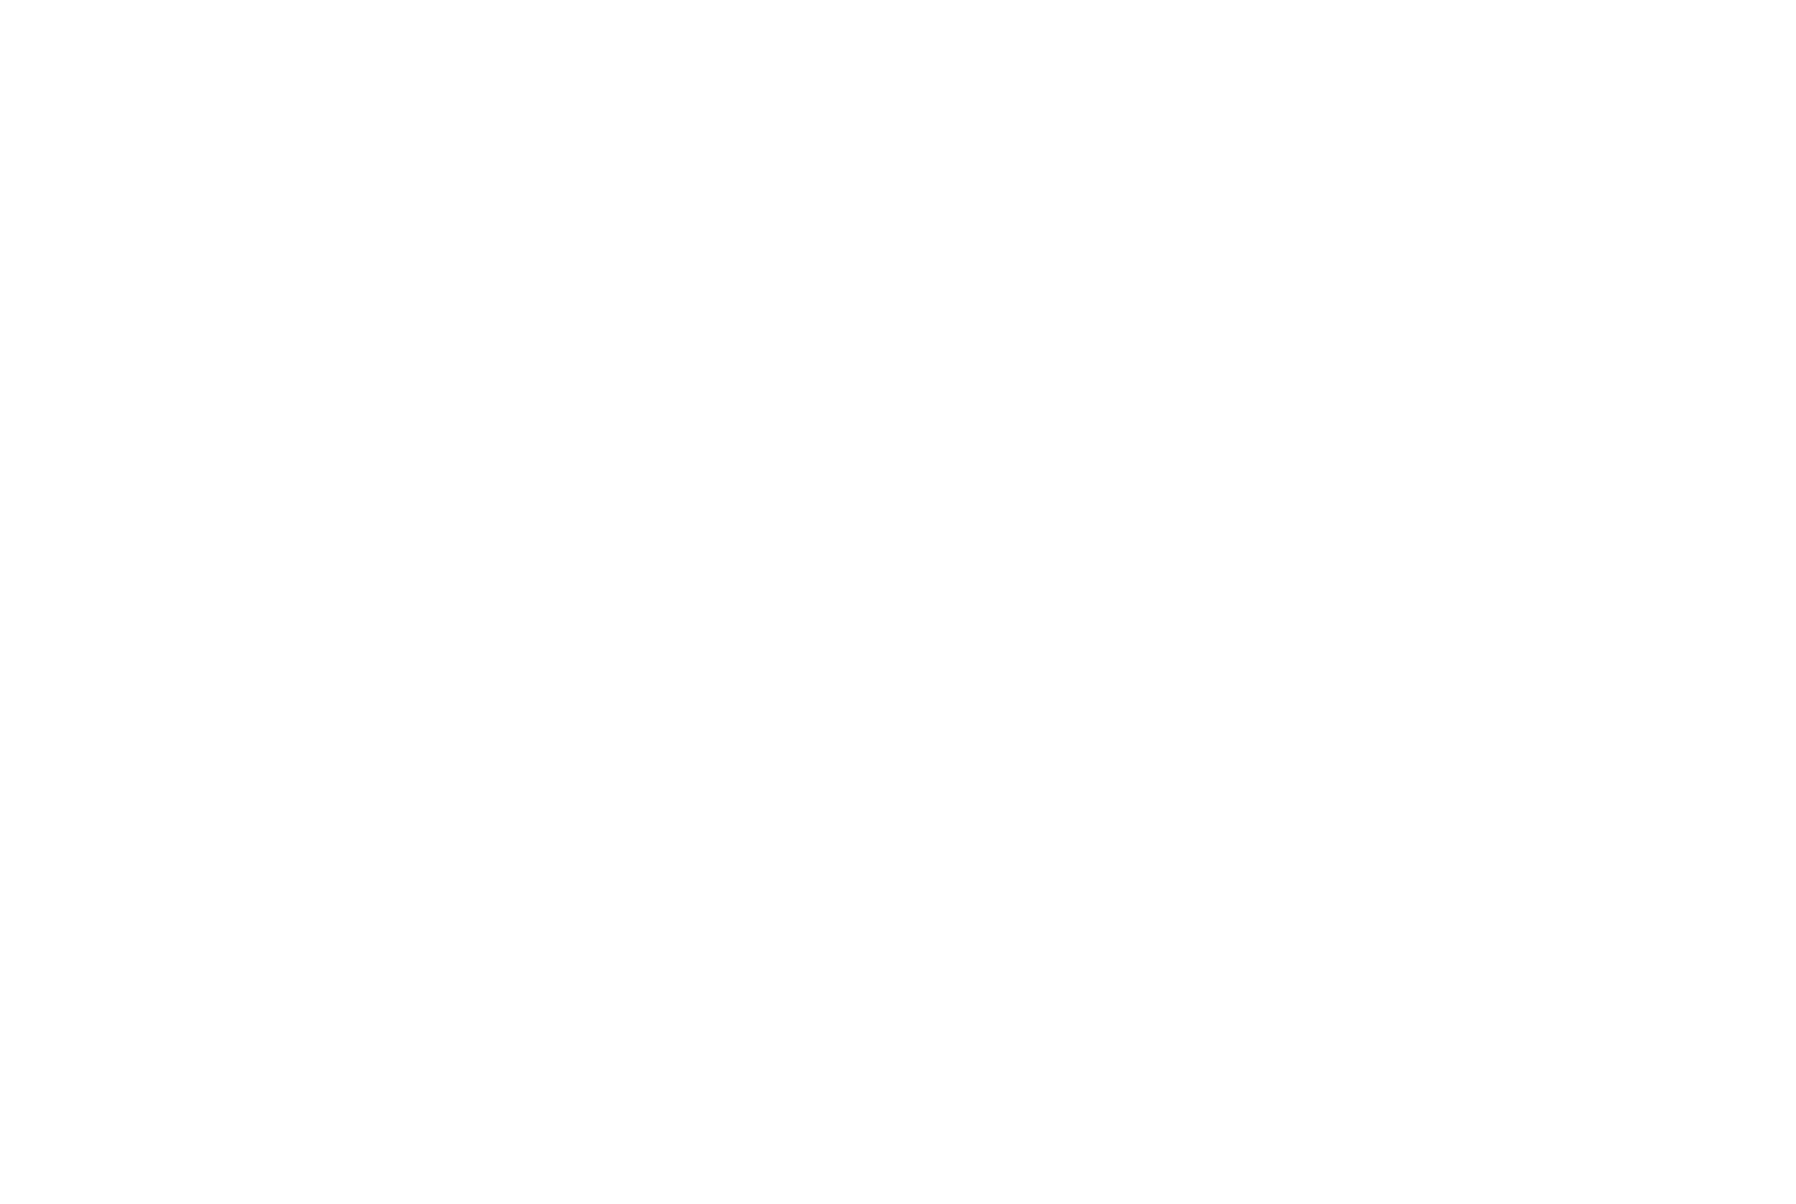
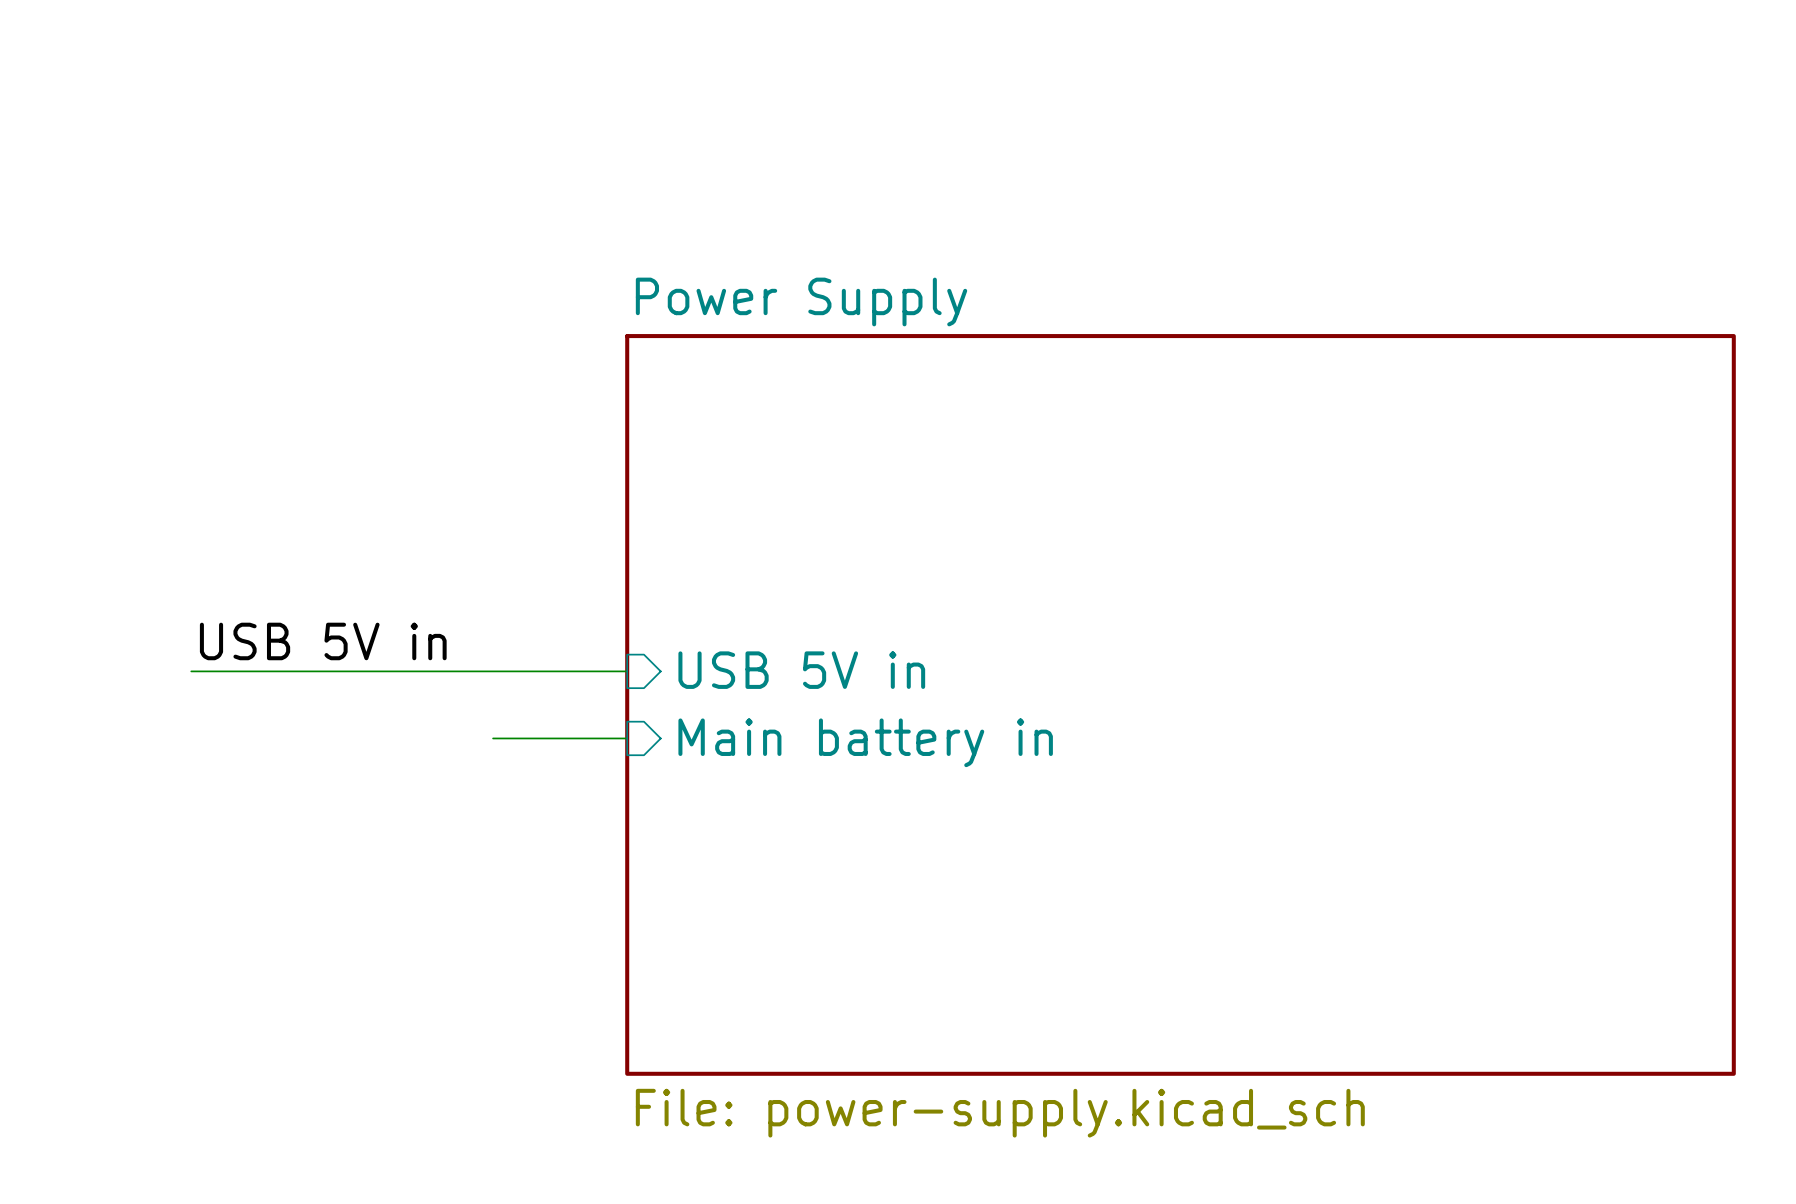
label: none -> USB 5V in (323, 641)
sheet pin: none -> USB 5V in (801, 670)
wire: none -> (191, 671) (627, 671)
sheet Power Supply: none -> File: power-supply.kicad_sch (1180, 704)
wire: none -> (493, 738) (627, 738)
sheet pin: none -> Main battery in (865, 742)

